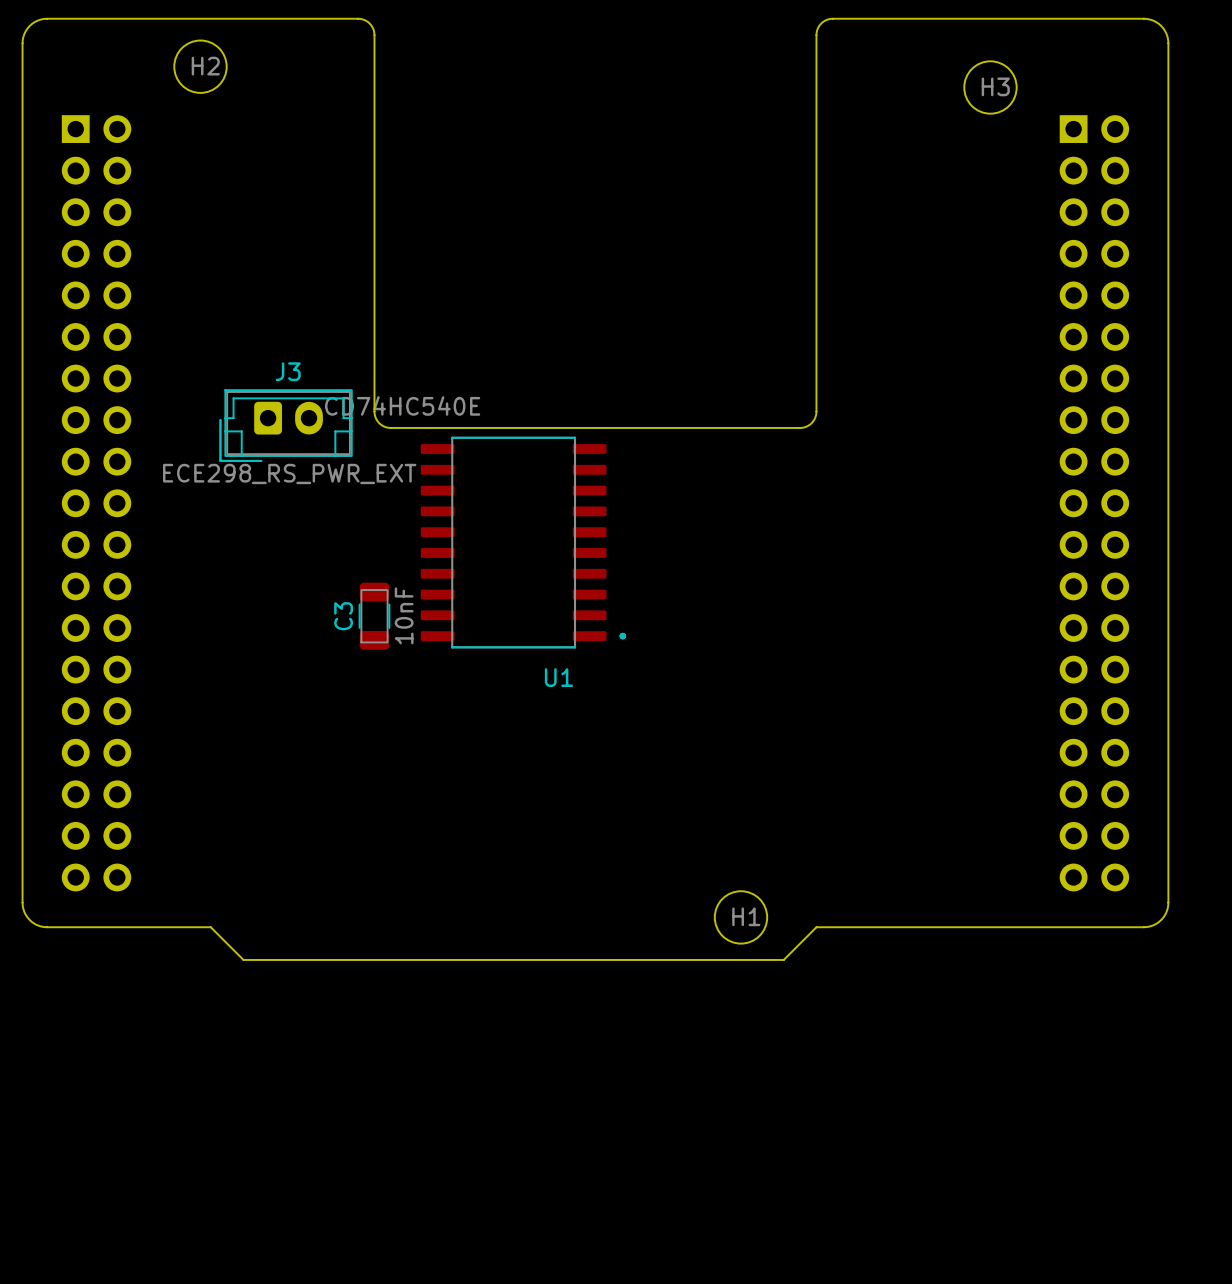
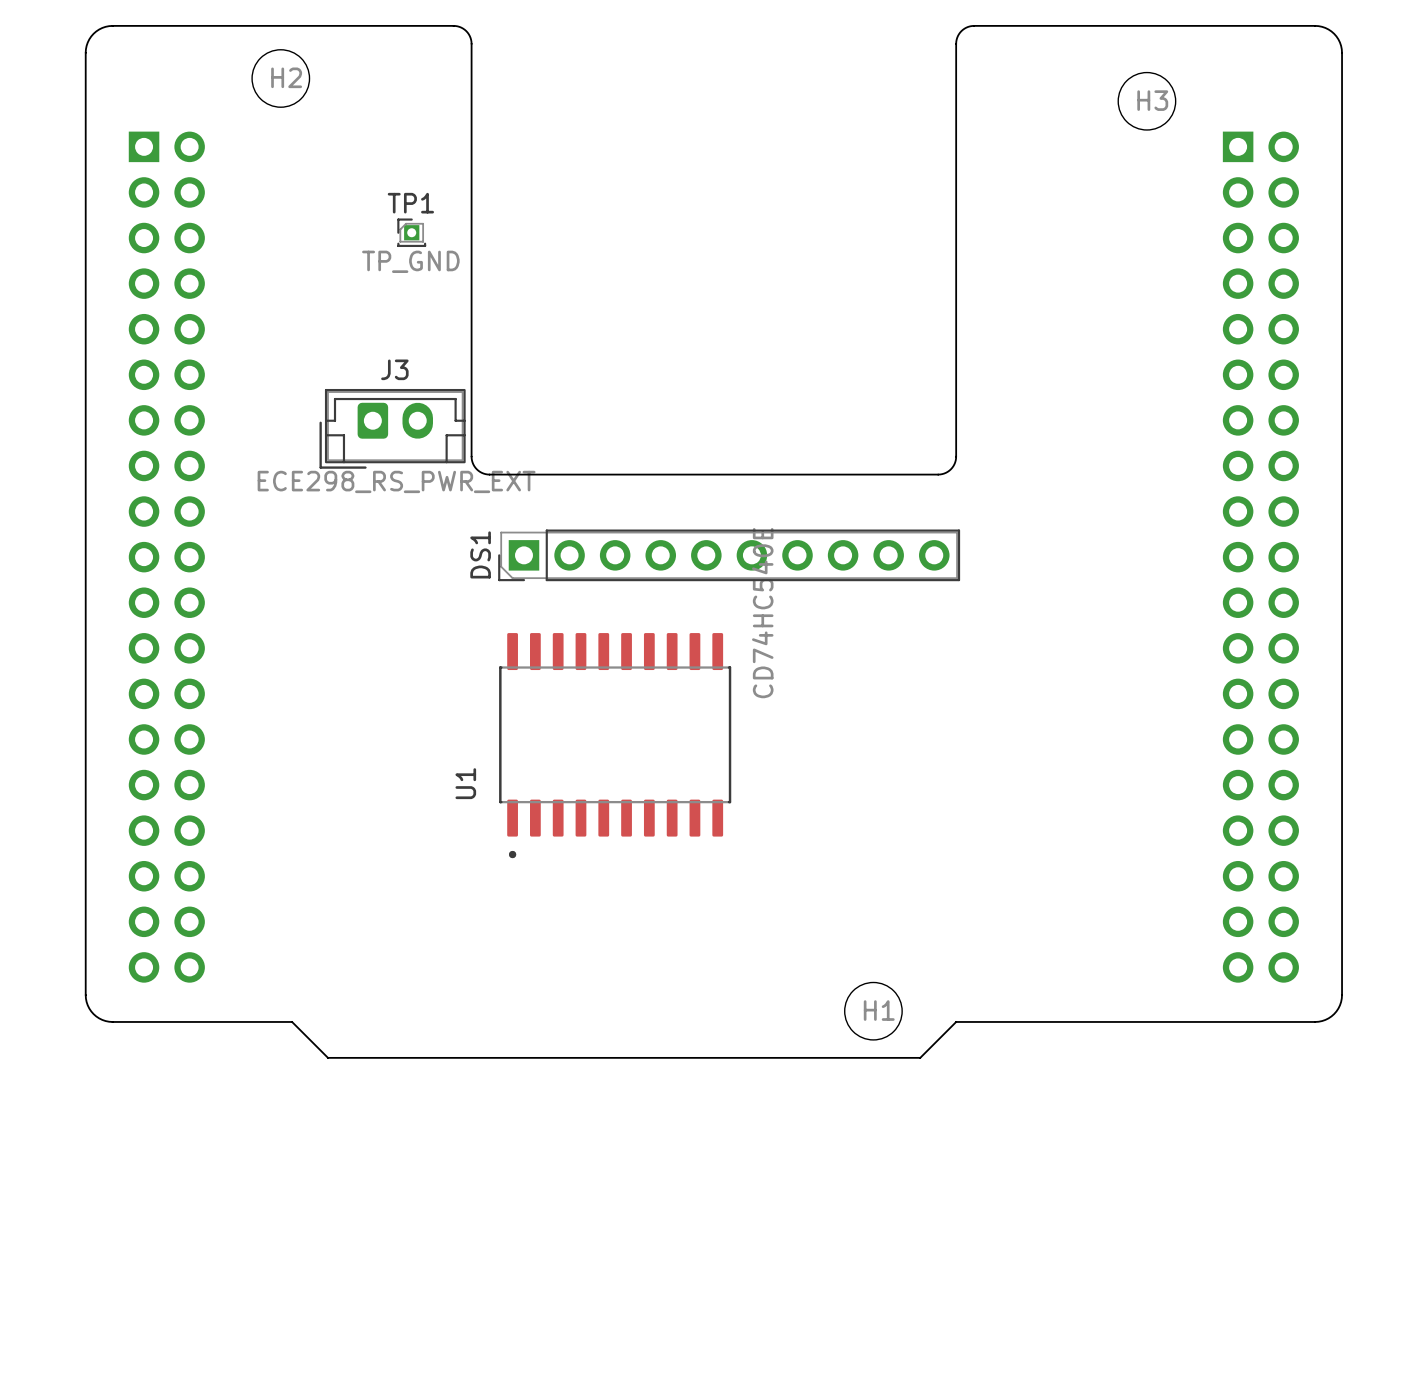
TP1: none -> TP_GND (411, 232)
J3 position: (286, 425) -> (392, 428)
DS1: none -> (729, 555)
U1 rotation: 0° (523, 542) -> 90° clockwise (615, 745)
U1 position: (523, 542) -> (615, 745)
C3: 10nF (374, 616) -> none

